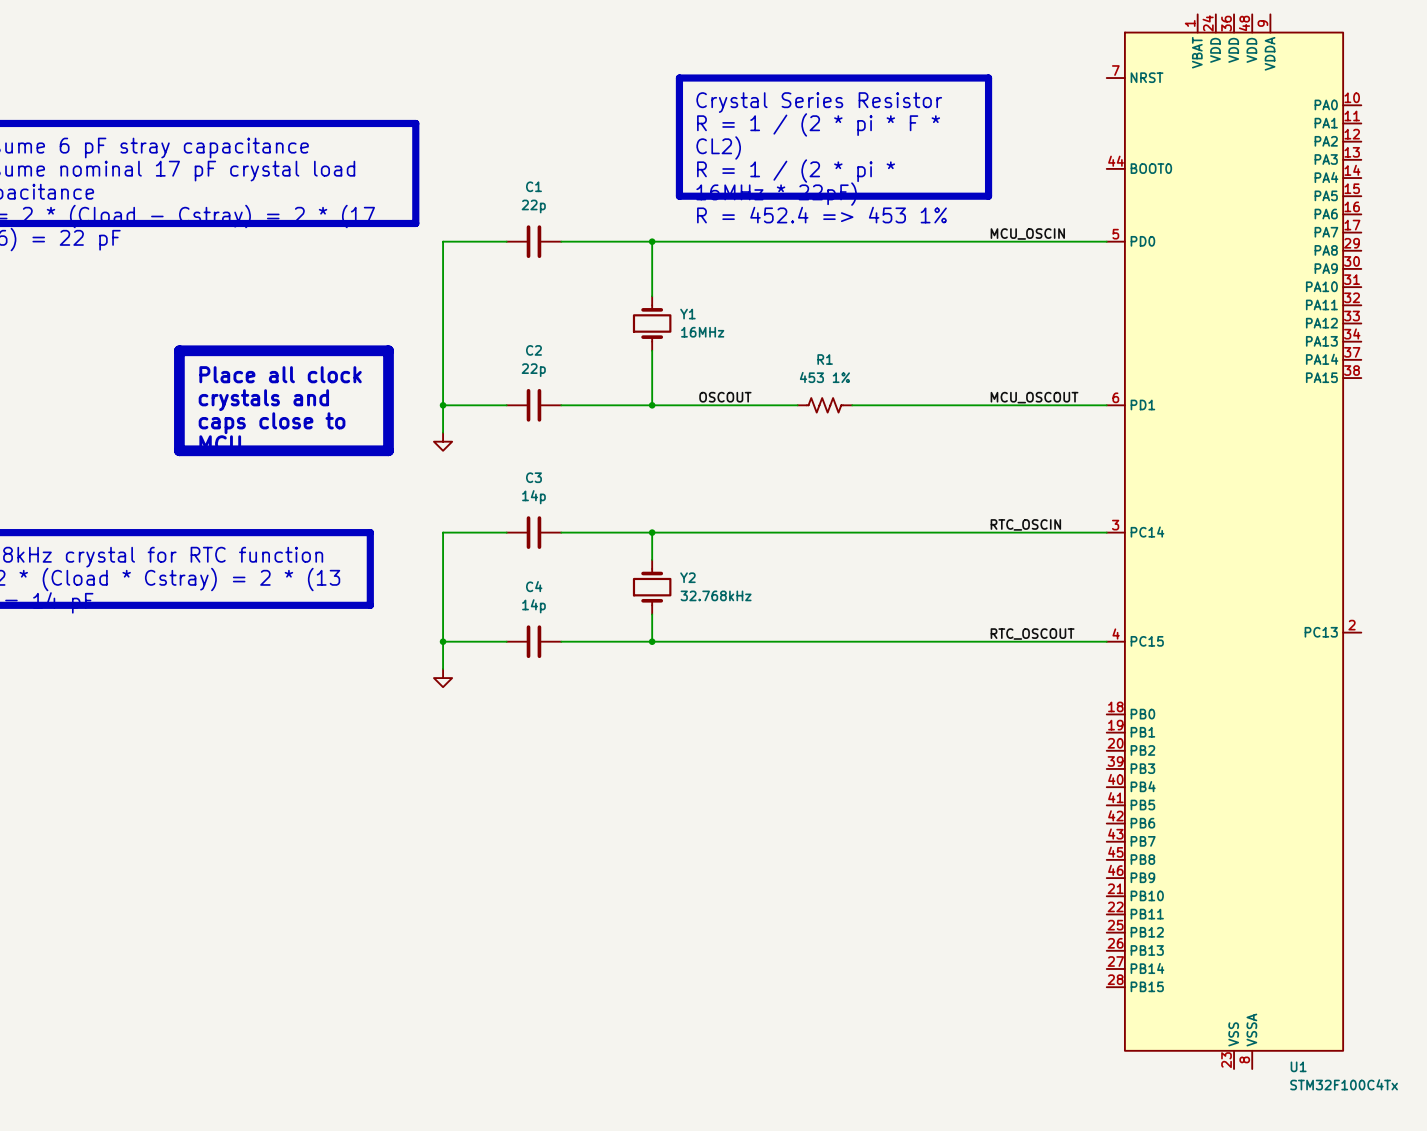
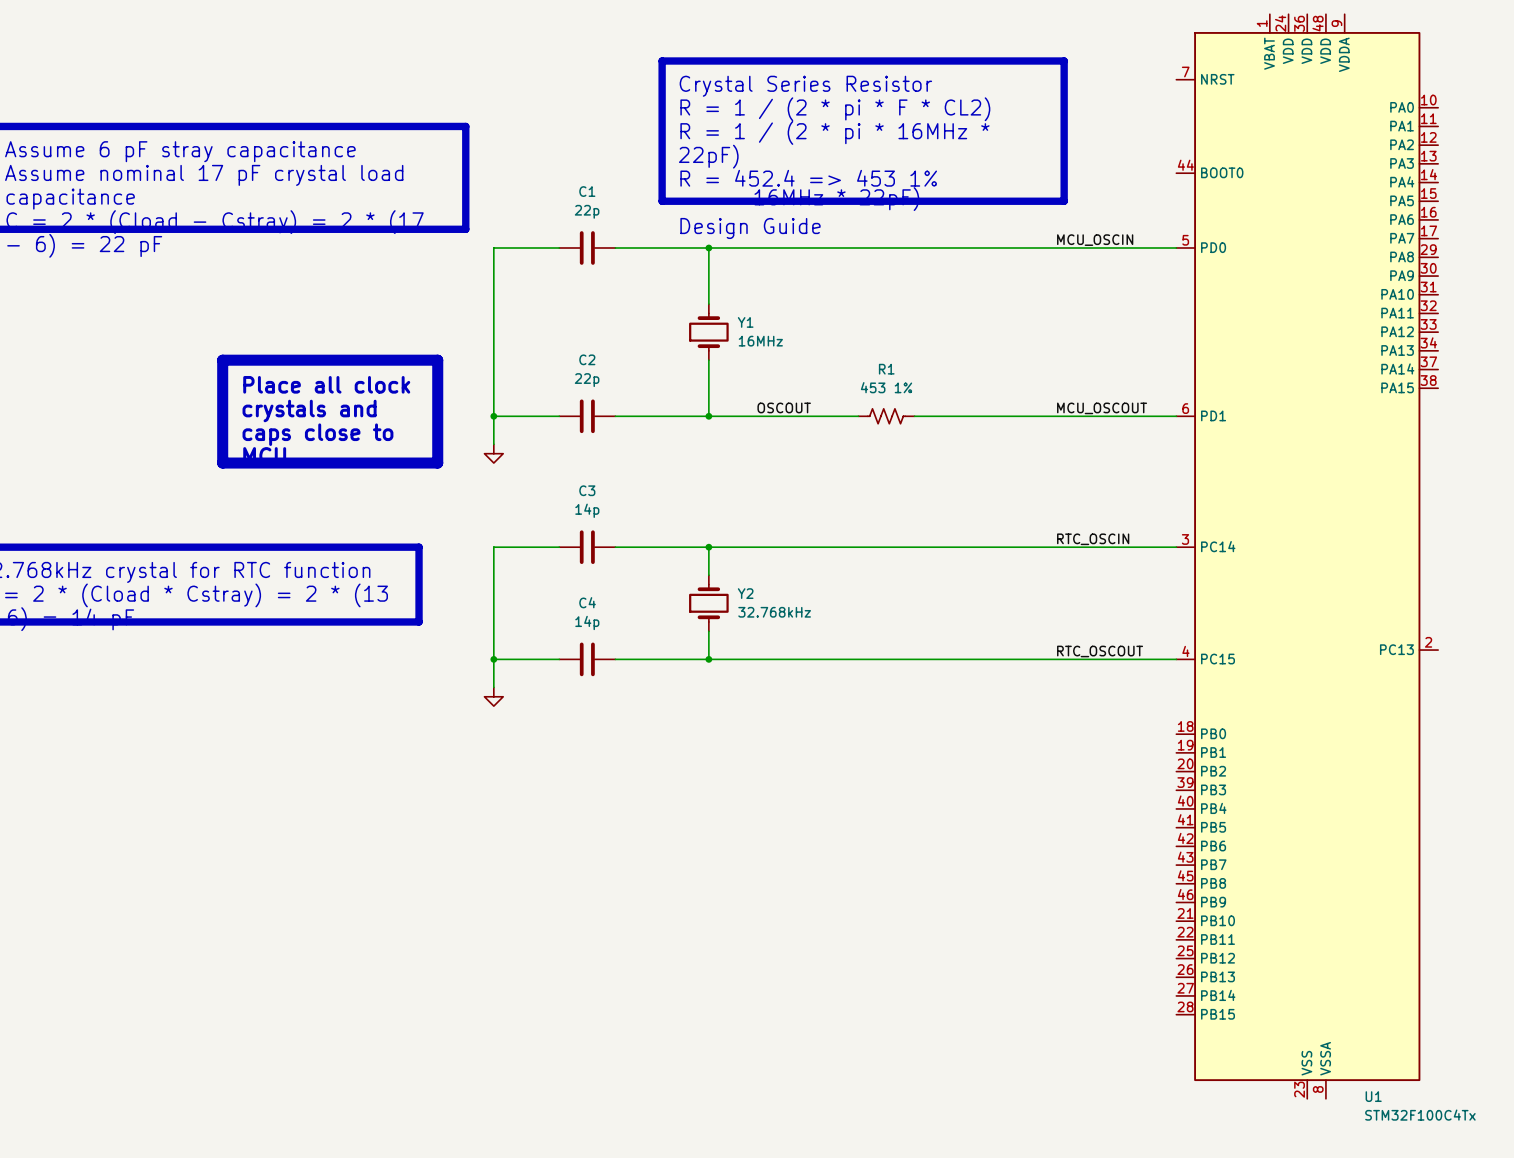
text position: Crystal Series Resistor (819, 102) -> Crystal Series Resistor (805, 86)
text: none -> R = 1 / (2 * pi * F * CL2) (835, 109)
text: R = 1 / (2 * pi * F * (818, 124) -> none
text: none -> R = 1 / (2 * pi * 16MHz * (834, 132)
text: CL2) (718, 147) -> none
text: none -> 22pF) (708, 156)
text: R = 1 / (2 * pi * (796, 171) -> none
line: (679, 196) (679, 78) (988, 78) (988, 196) -> (736, 201) (662, 201) (662, 61) (1064, 61) (1064, 201) (1054, 201)
text position: R = 452.4 => 453 1% (821, 215) -> R = 452.4 => 453 1% (808, 178)
text: none -> Design Guide (750, 228)

